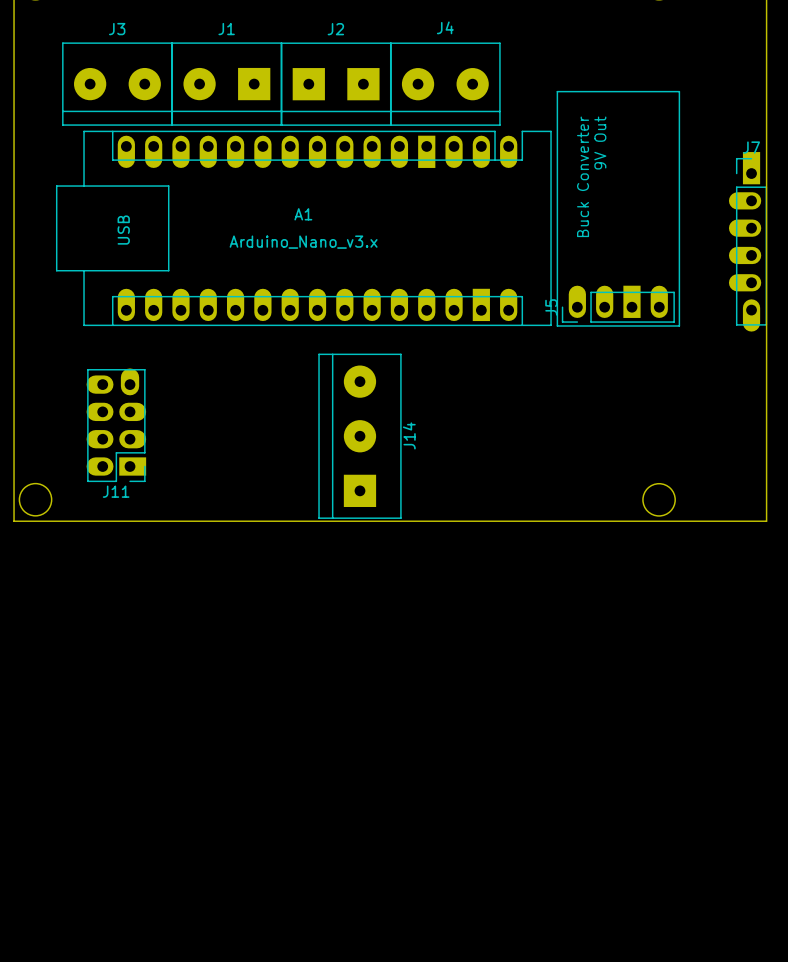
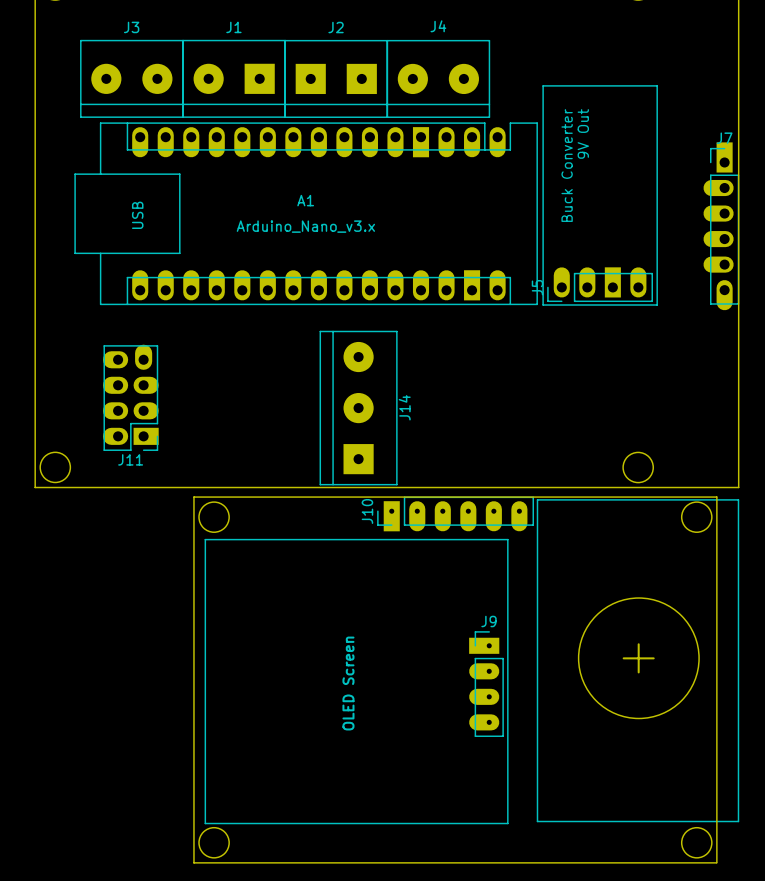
board edge: none -> (716, 497) (193, 497) (193, 862) (716, 862)
board edge: none -> (716, 496) (716, 862)
line: none -> (537, 499) (738, 499) (738, 821) (537, 821) (537, 499)
round board edge: none -> [198, 501, 230, 533]
round board edge: none -> [681, 501, 713, 533]
J10: none -> (455, 514)
line: none -> (205, 539) (507, 539) (507, 823) (205, 823) (205, 539)
round board edge: none -> [578, 597, 700, 719]
board edge: none -> (638, 644) (638, 672)
board edge: none -> (623, 658) (653, 658)
text: none -> OLED Screen (348, 683)
J9: none -> (486, 684)
round board edge: none -> [198, 827, 230, 859]
round board edge: none -> [681, 827, 713, 859]

